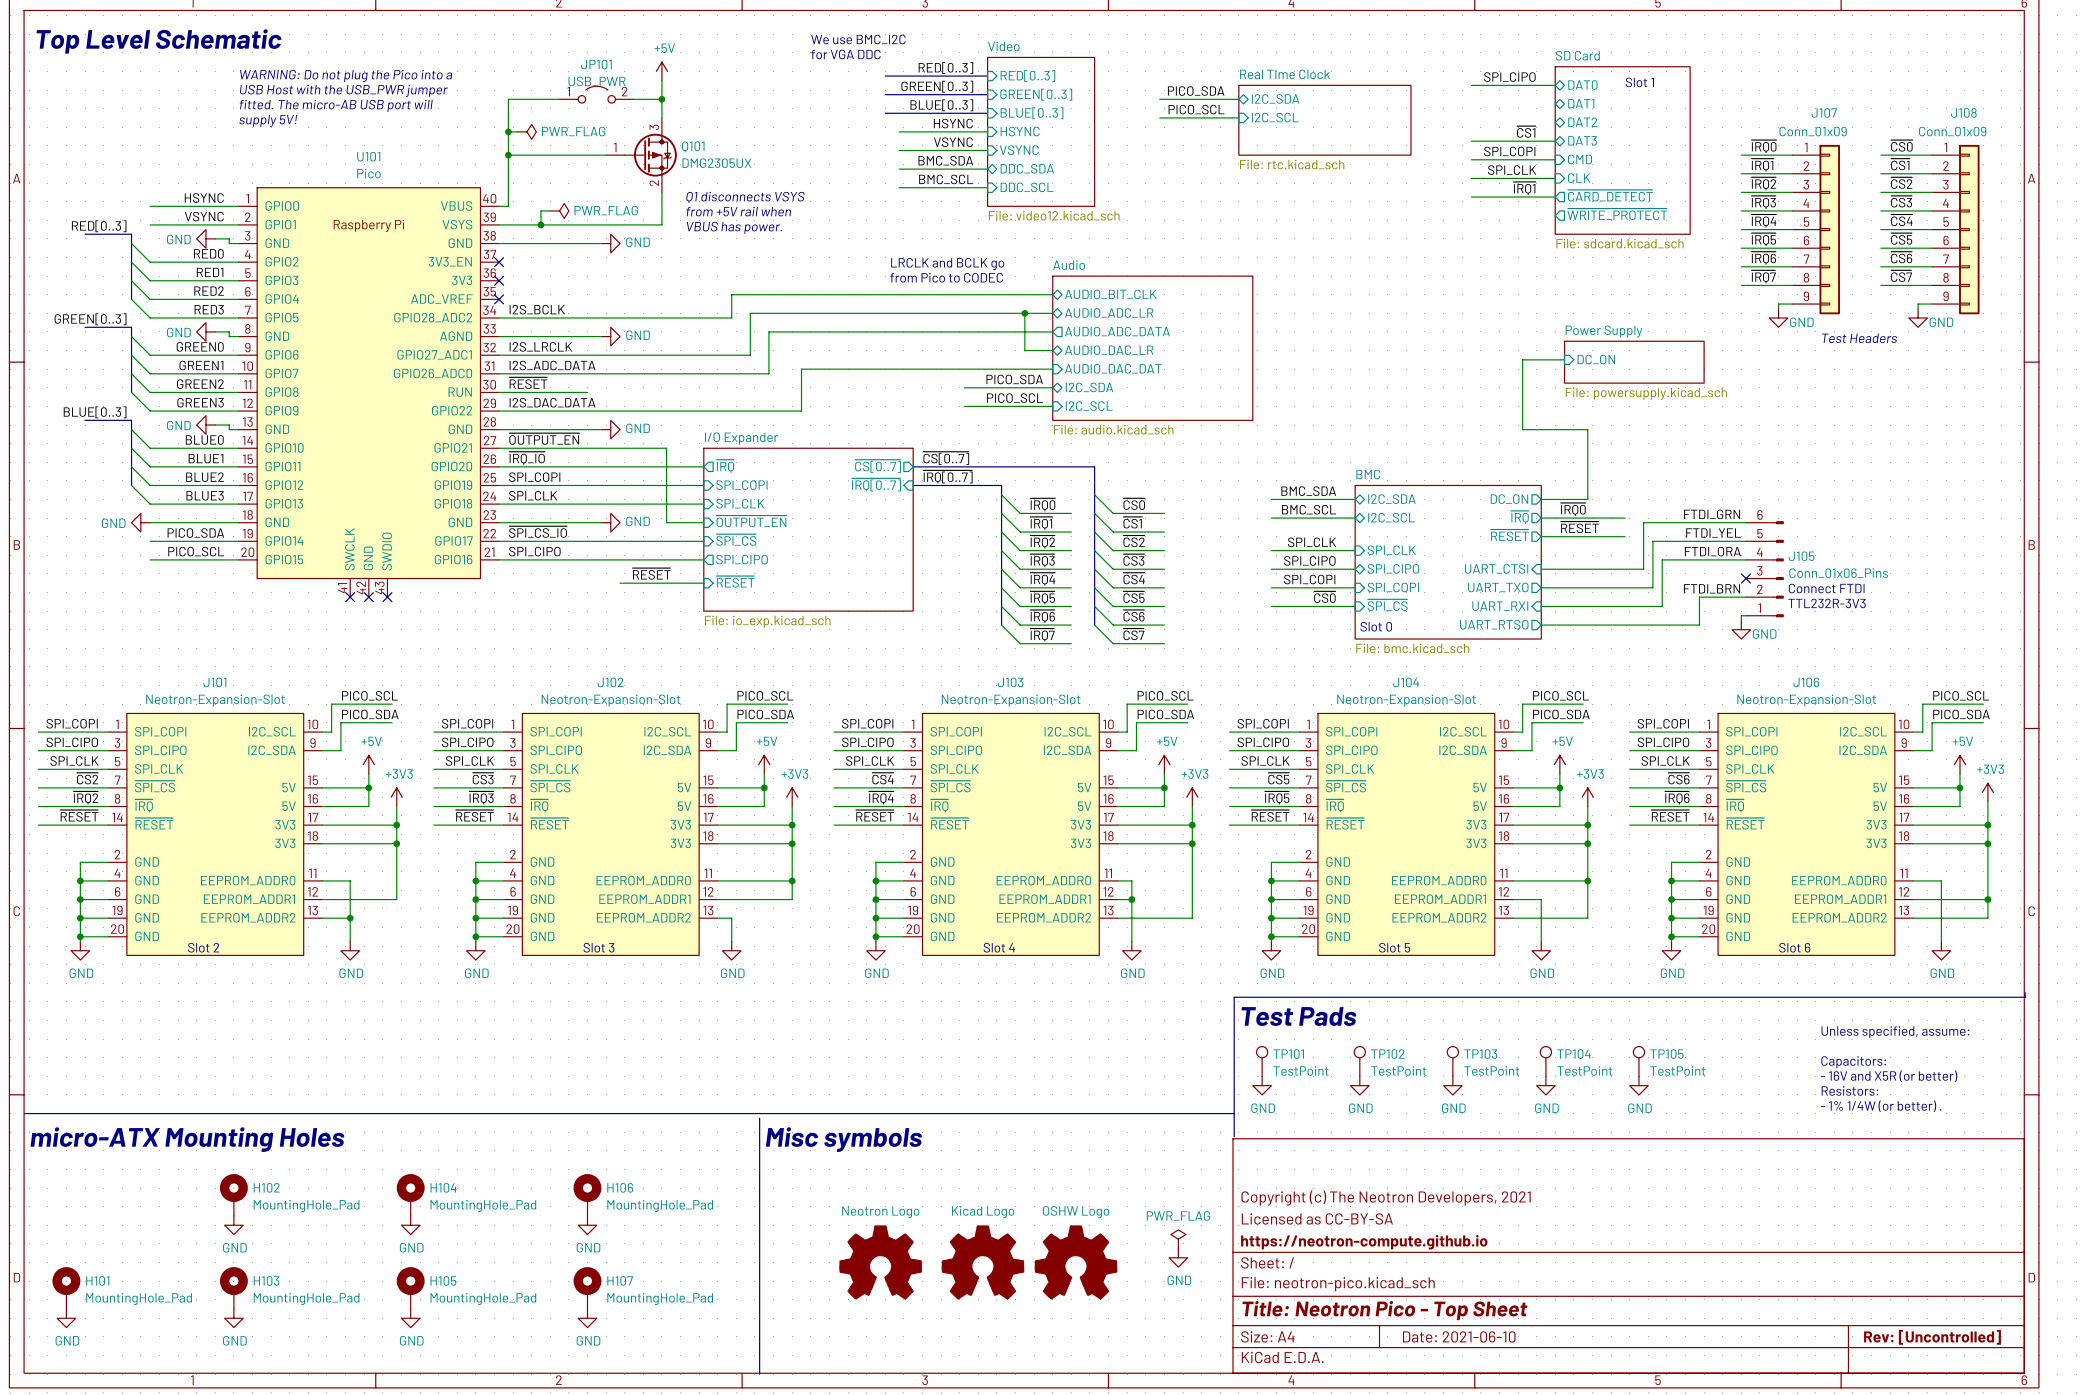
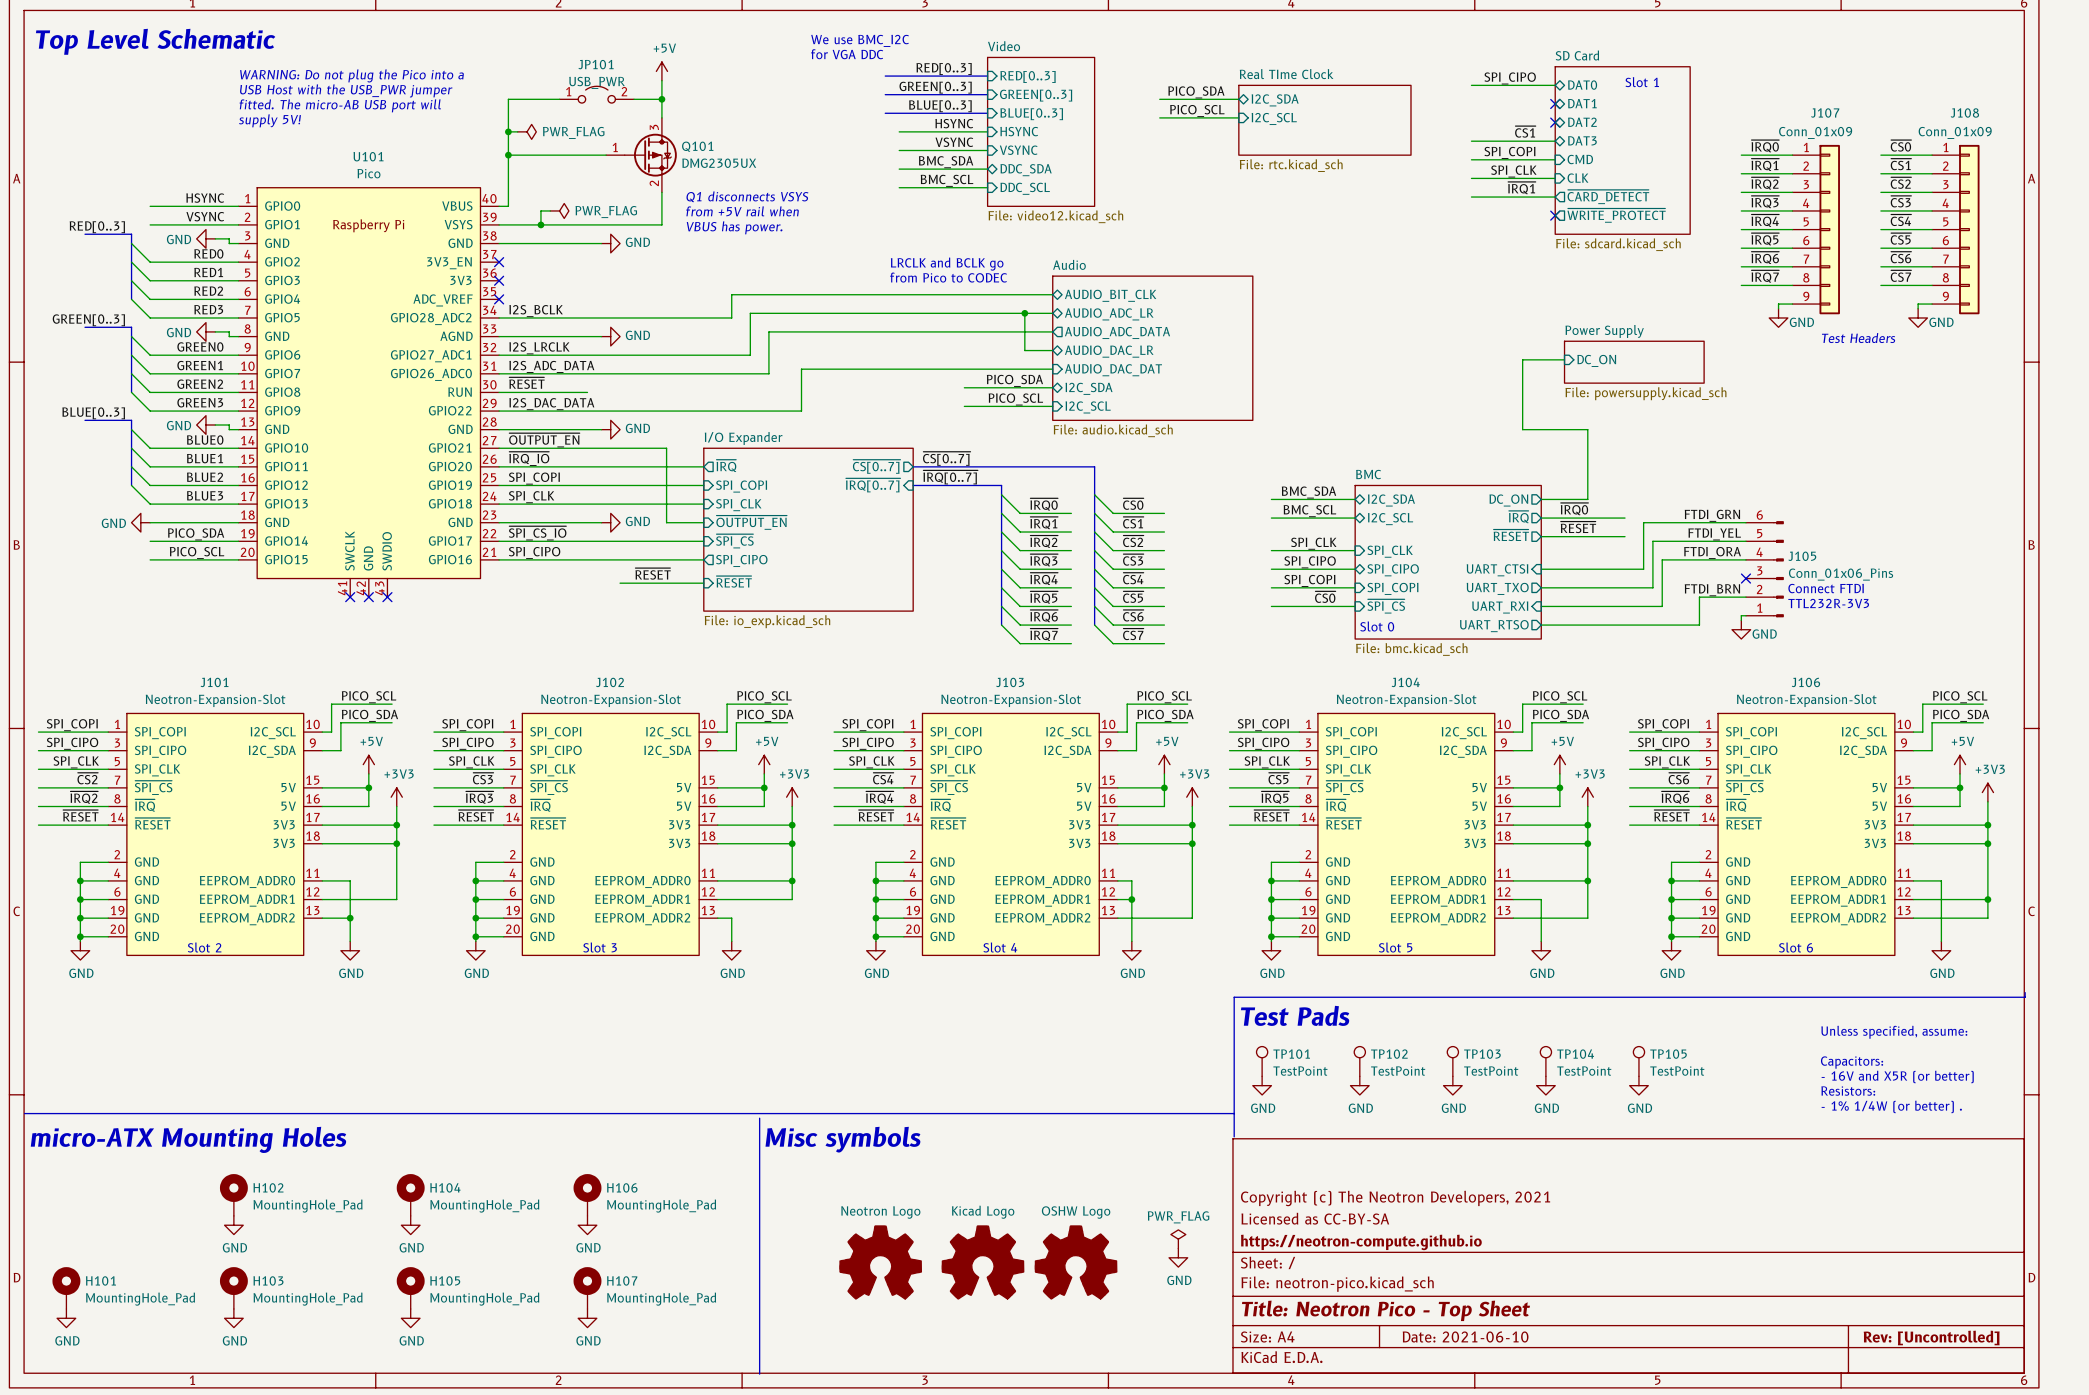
no-connect mark: none -> (1555, 103)
no-connect mark: none -> (1555, 122)
no-connect mark: none -> (1555, 215)

